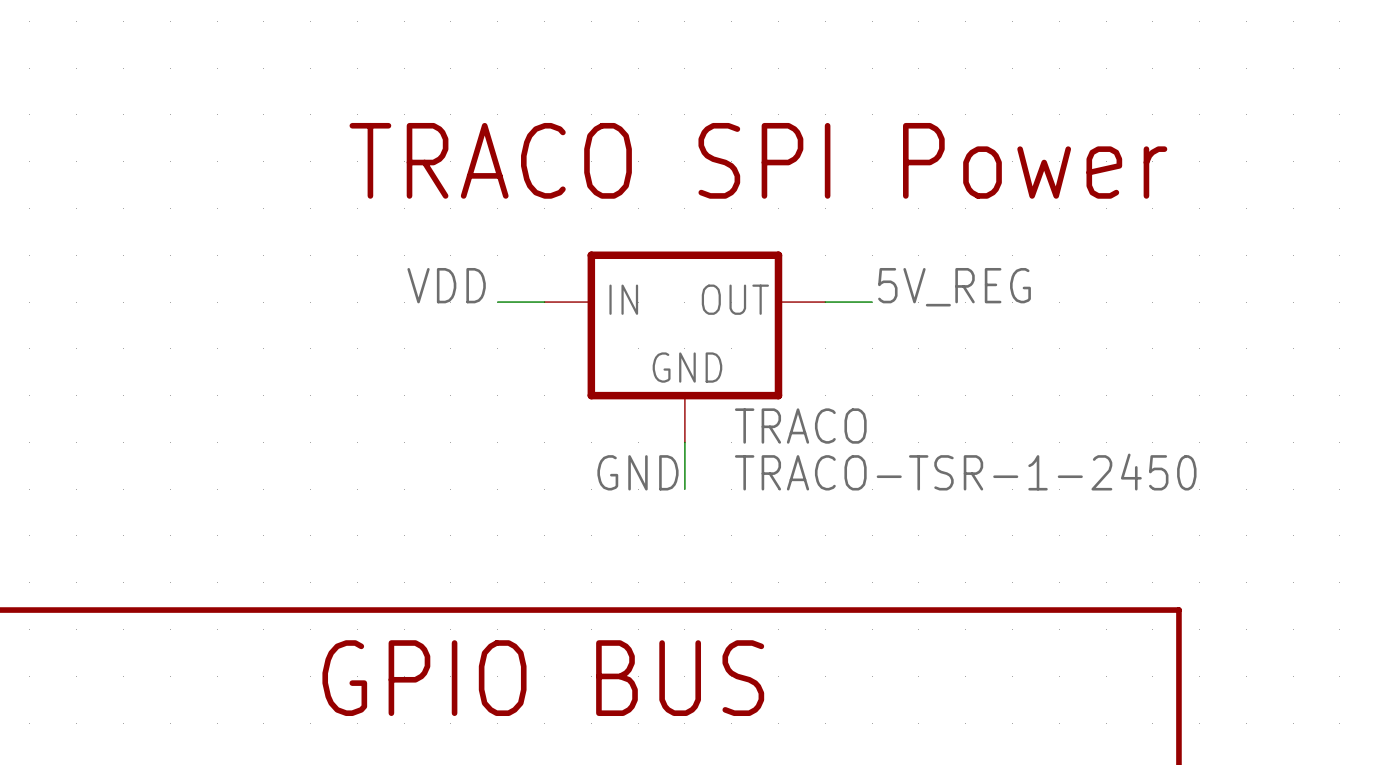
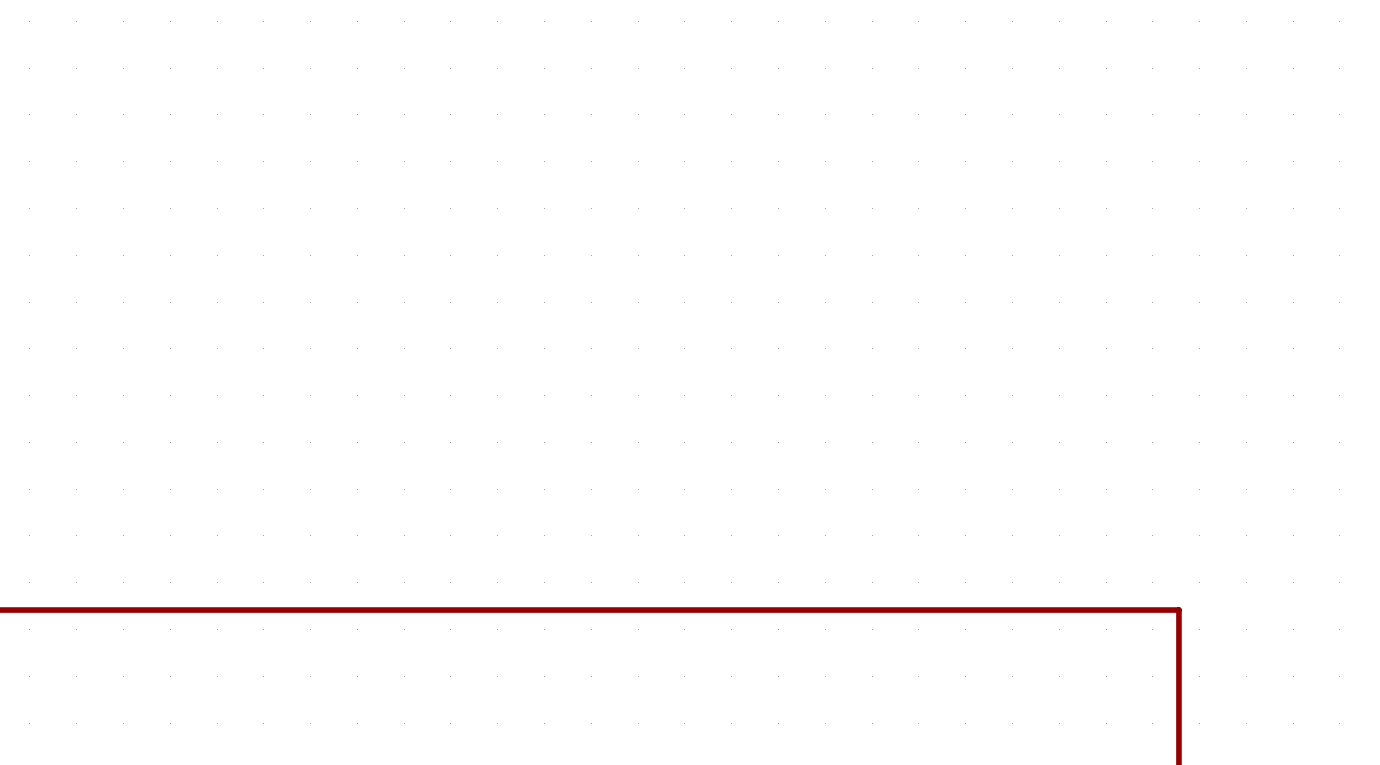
text: TRACO SPI Power (758, 160) -> none
label: VDD (446, 285) -> none
label: 5V_REG (954, 287) -> none
wire: (497, 302) (544, 302) -> none
wire: (825, 302) (872, 302) -> none
TRACO: TRACO-TSR-1-2450 (684, 346) -> none
wire: (684, 442) (684, 489) -> none
label: GND (637, 472) -> none
text: GPIO BUS (543, 678) -> none

